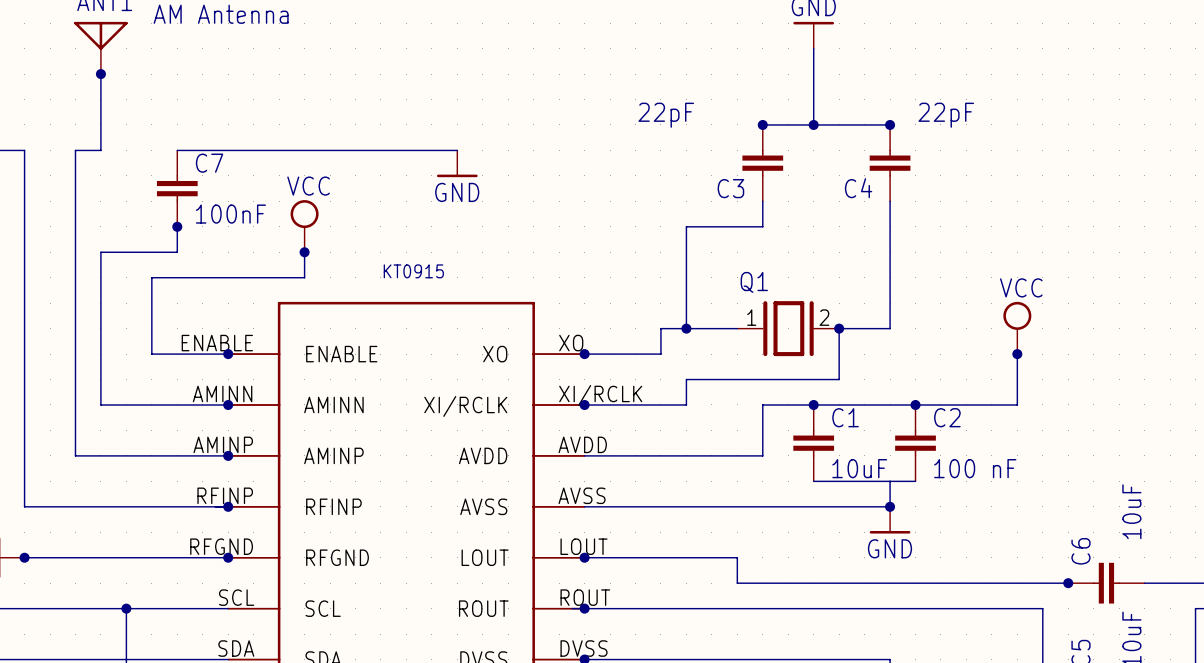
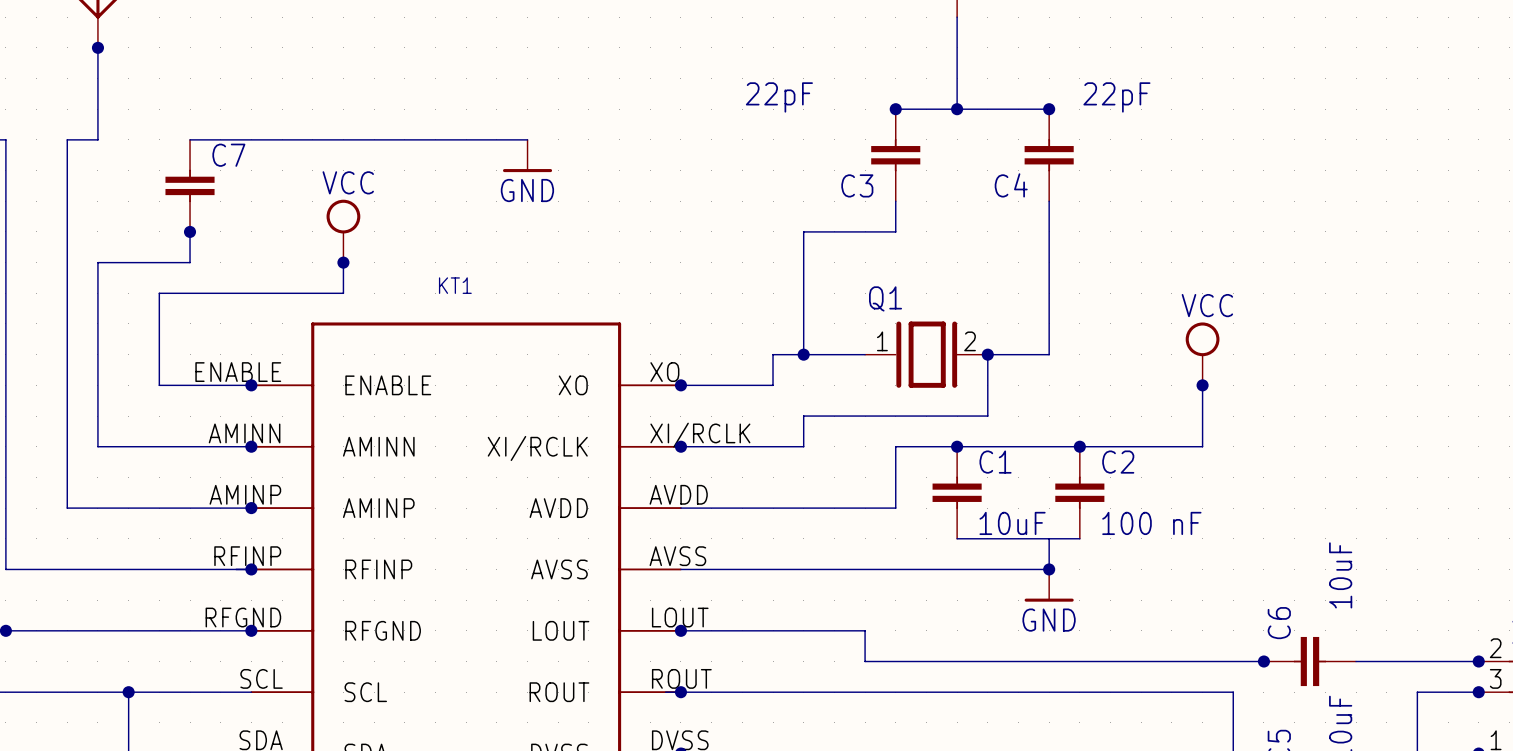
C7 value: 100nF (230, 214) -> none
KT0915 name: KT0915 (413, 271) -> KT1 (455, 285)

